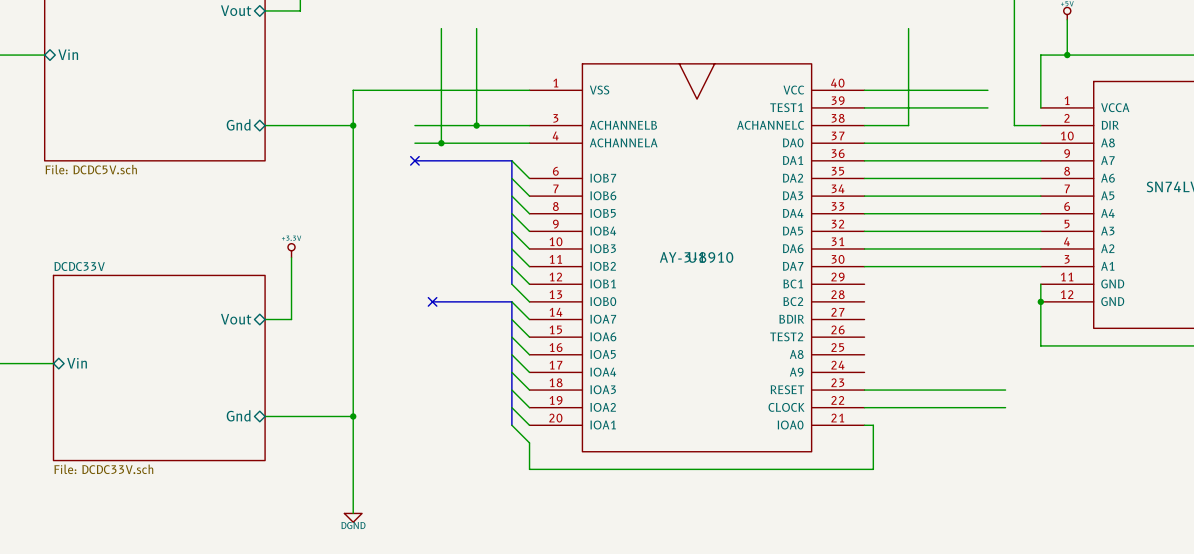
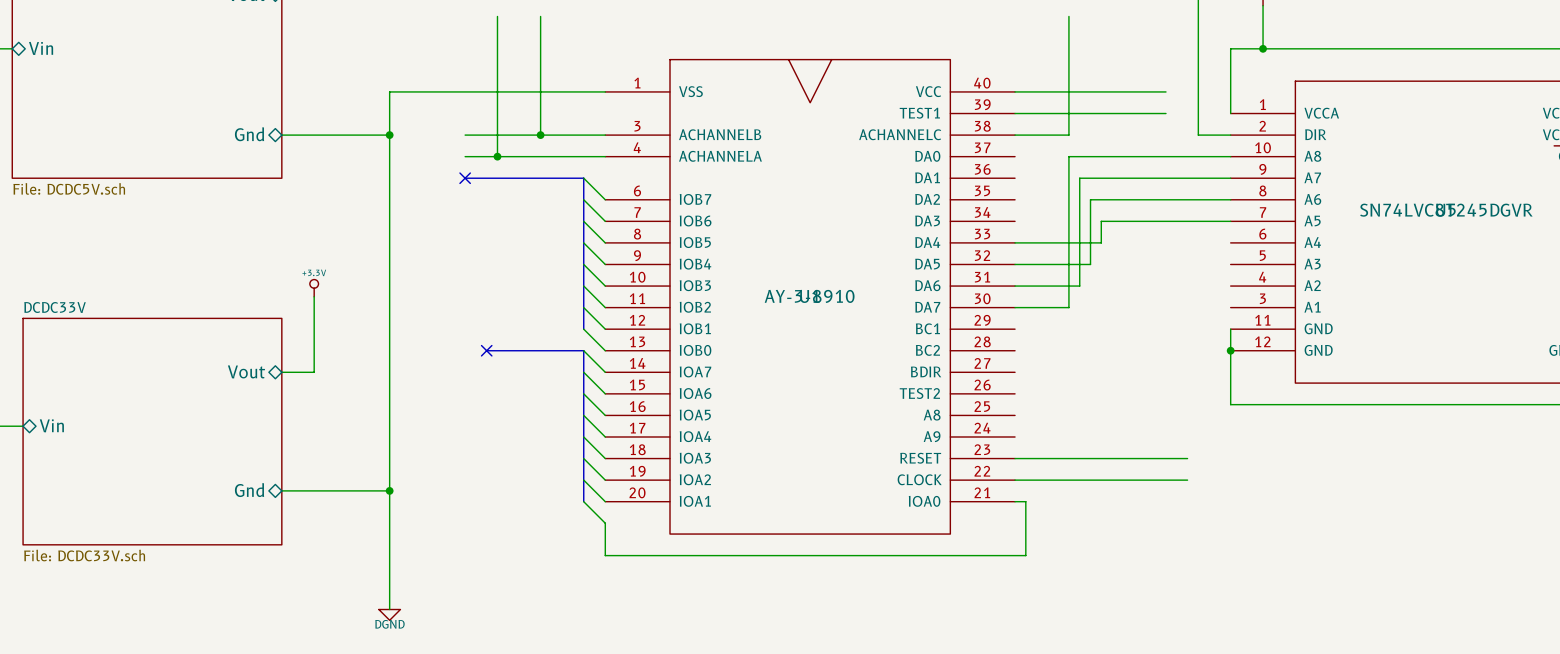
wire: (864, 143) (908, 143) -> (1068, 307) (1068, 156)
wire: (864, 160) (917, 160) -> (1079, 286) (1079, 178)
wire: (864, 178) (926, 178) -> (1090, 264) (1090, 199)
wire: (864, 196) (935, 196) -> (1101, 242) (1101, 221)
wire: (935, 213) (1040, 213) -> none
wire: (926, 231) (1040, 231) -> none
wire: (917, 248) (1040, 248) -> none
wire: (908, 266) (1040, 266) -> none

